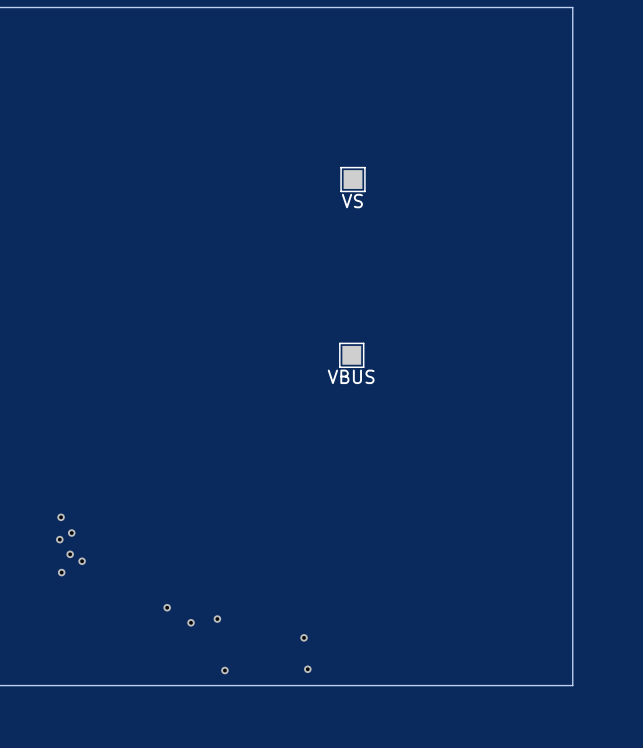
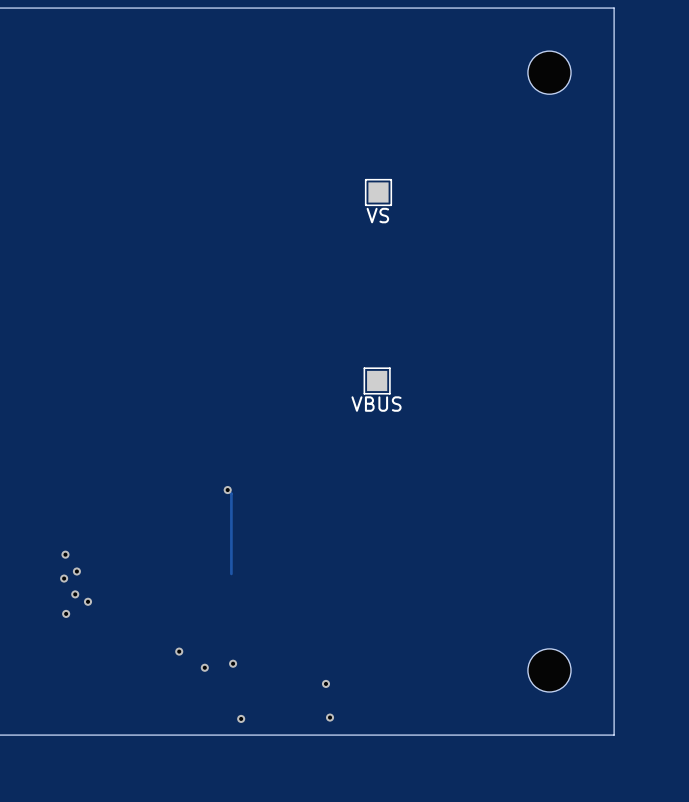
part: none -> (549, 72)
track: none -> (227, 490) (231, 493) (231, 573)
via: none -> (227, 490)
part: none -> (549, 670)

